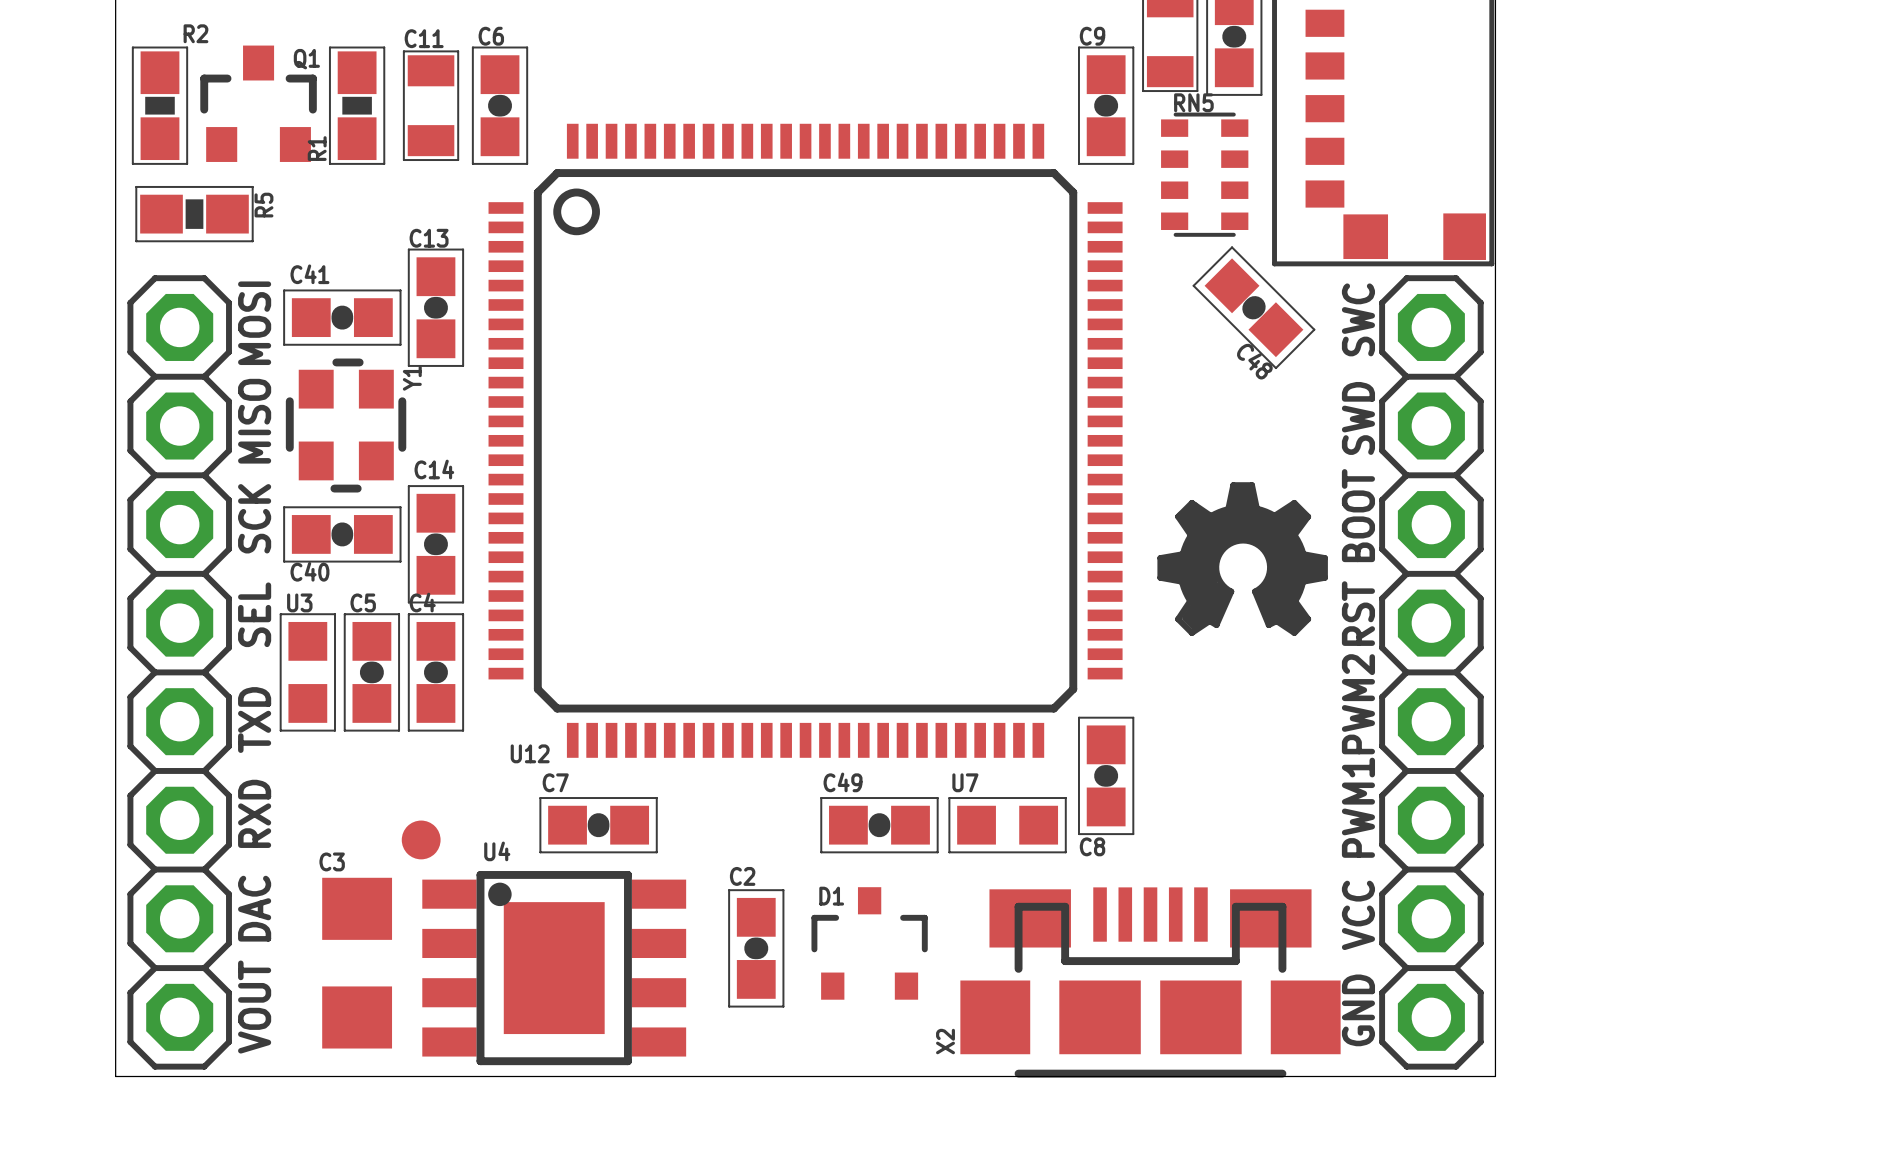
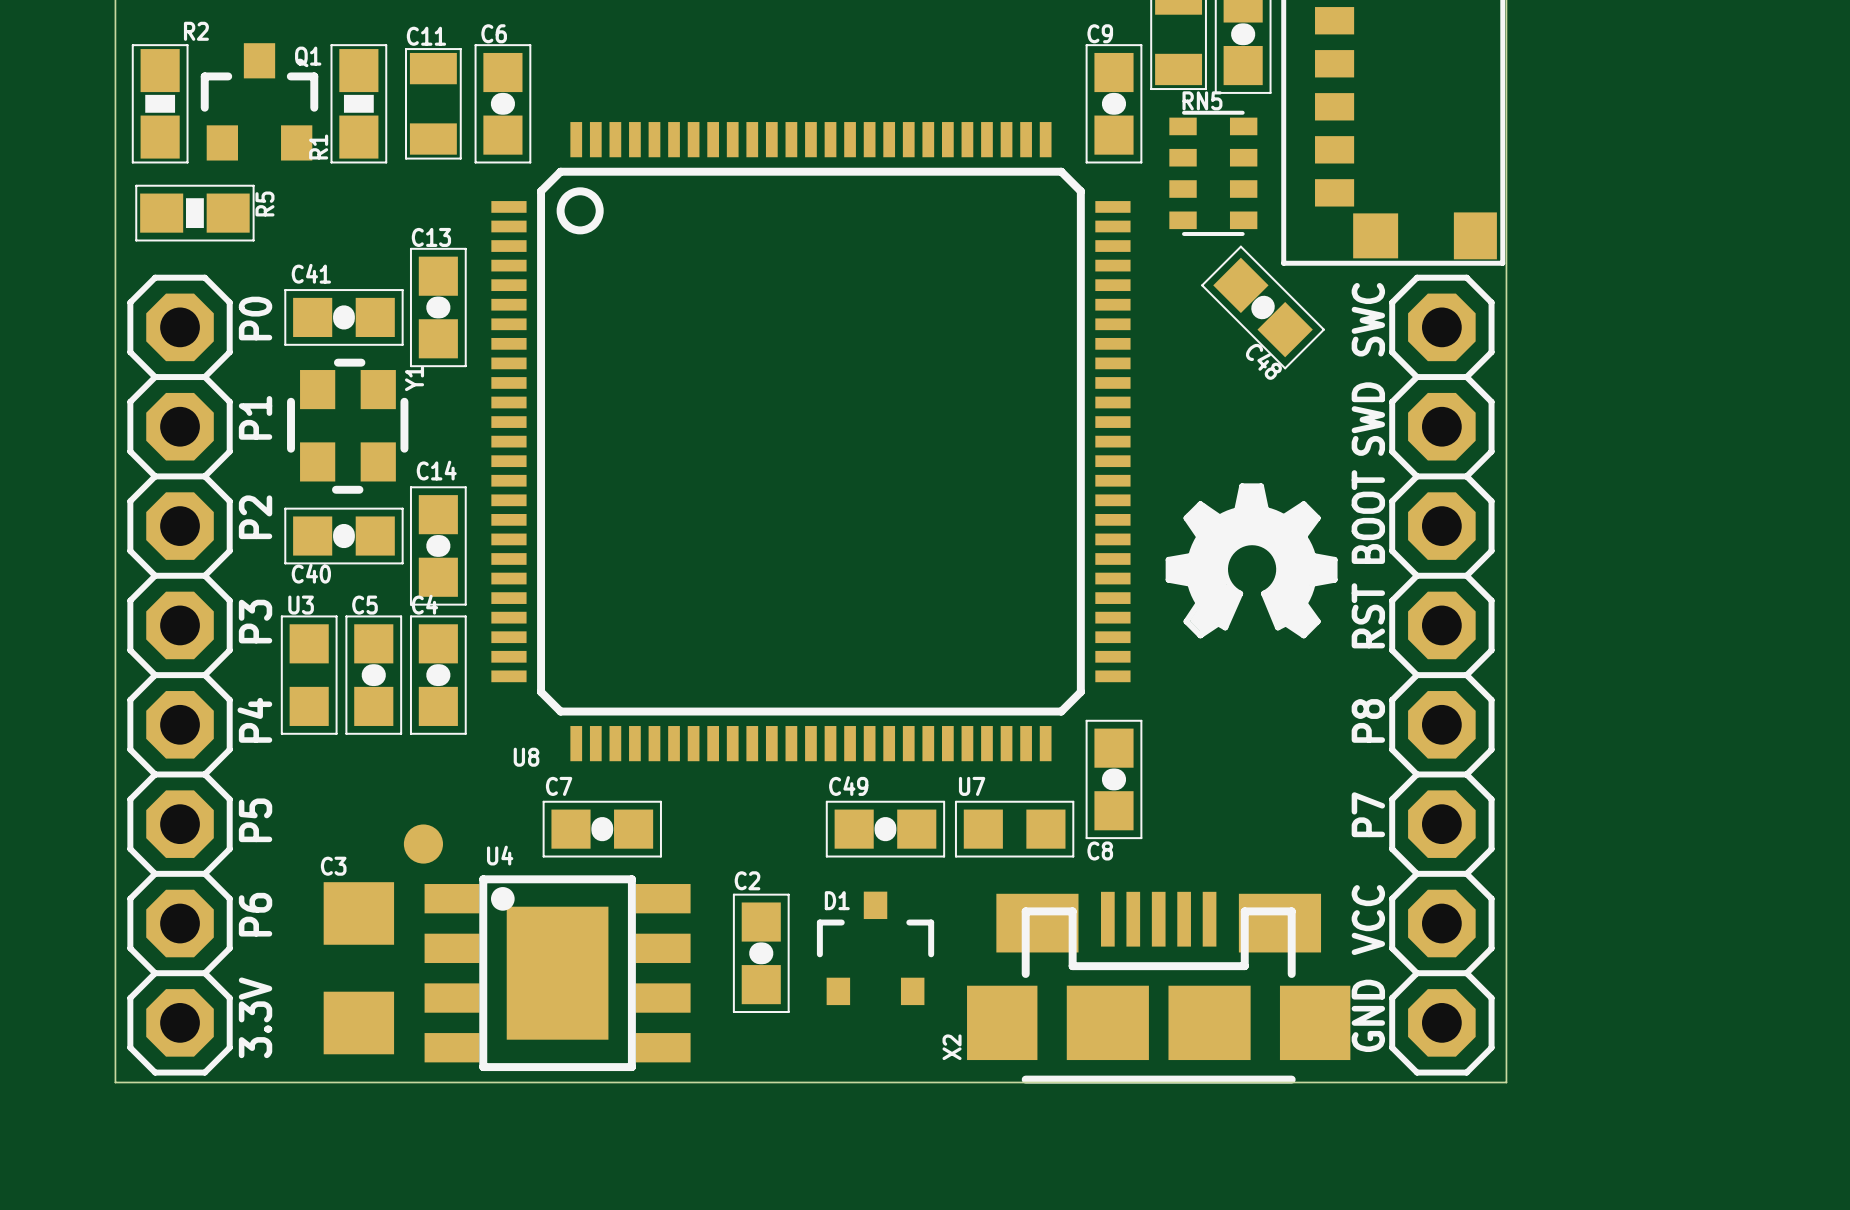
text: MOSI (254, 323) -> P0 (255, 318)
text: MISO (254, 421) -> P1 (255, 417)
text: SCK (254, 518) -> P2 (255, 517)
text: SEL (254, 614) -> P3 (255, 621)
text: PWM2 (1358, 704) -> P8 (1368, 720)
text: TXD (254, 720) -> P4 (254, 720)
U12 name: U12 (530, 753) -> U8 (526, 757)
text: PWM1 (1358, 807) -> P7 (1368, 814)
text: RXD (254, 813) -> P5 (255, 820)
text: DAC (254, 908) -> P6 (255, 914)
text: VOUT (254, 1007) -> 3.3V (255, 1017)

